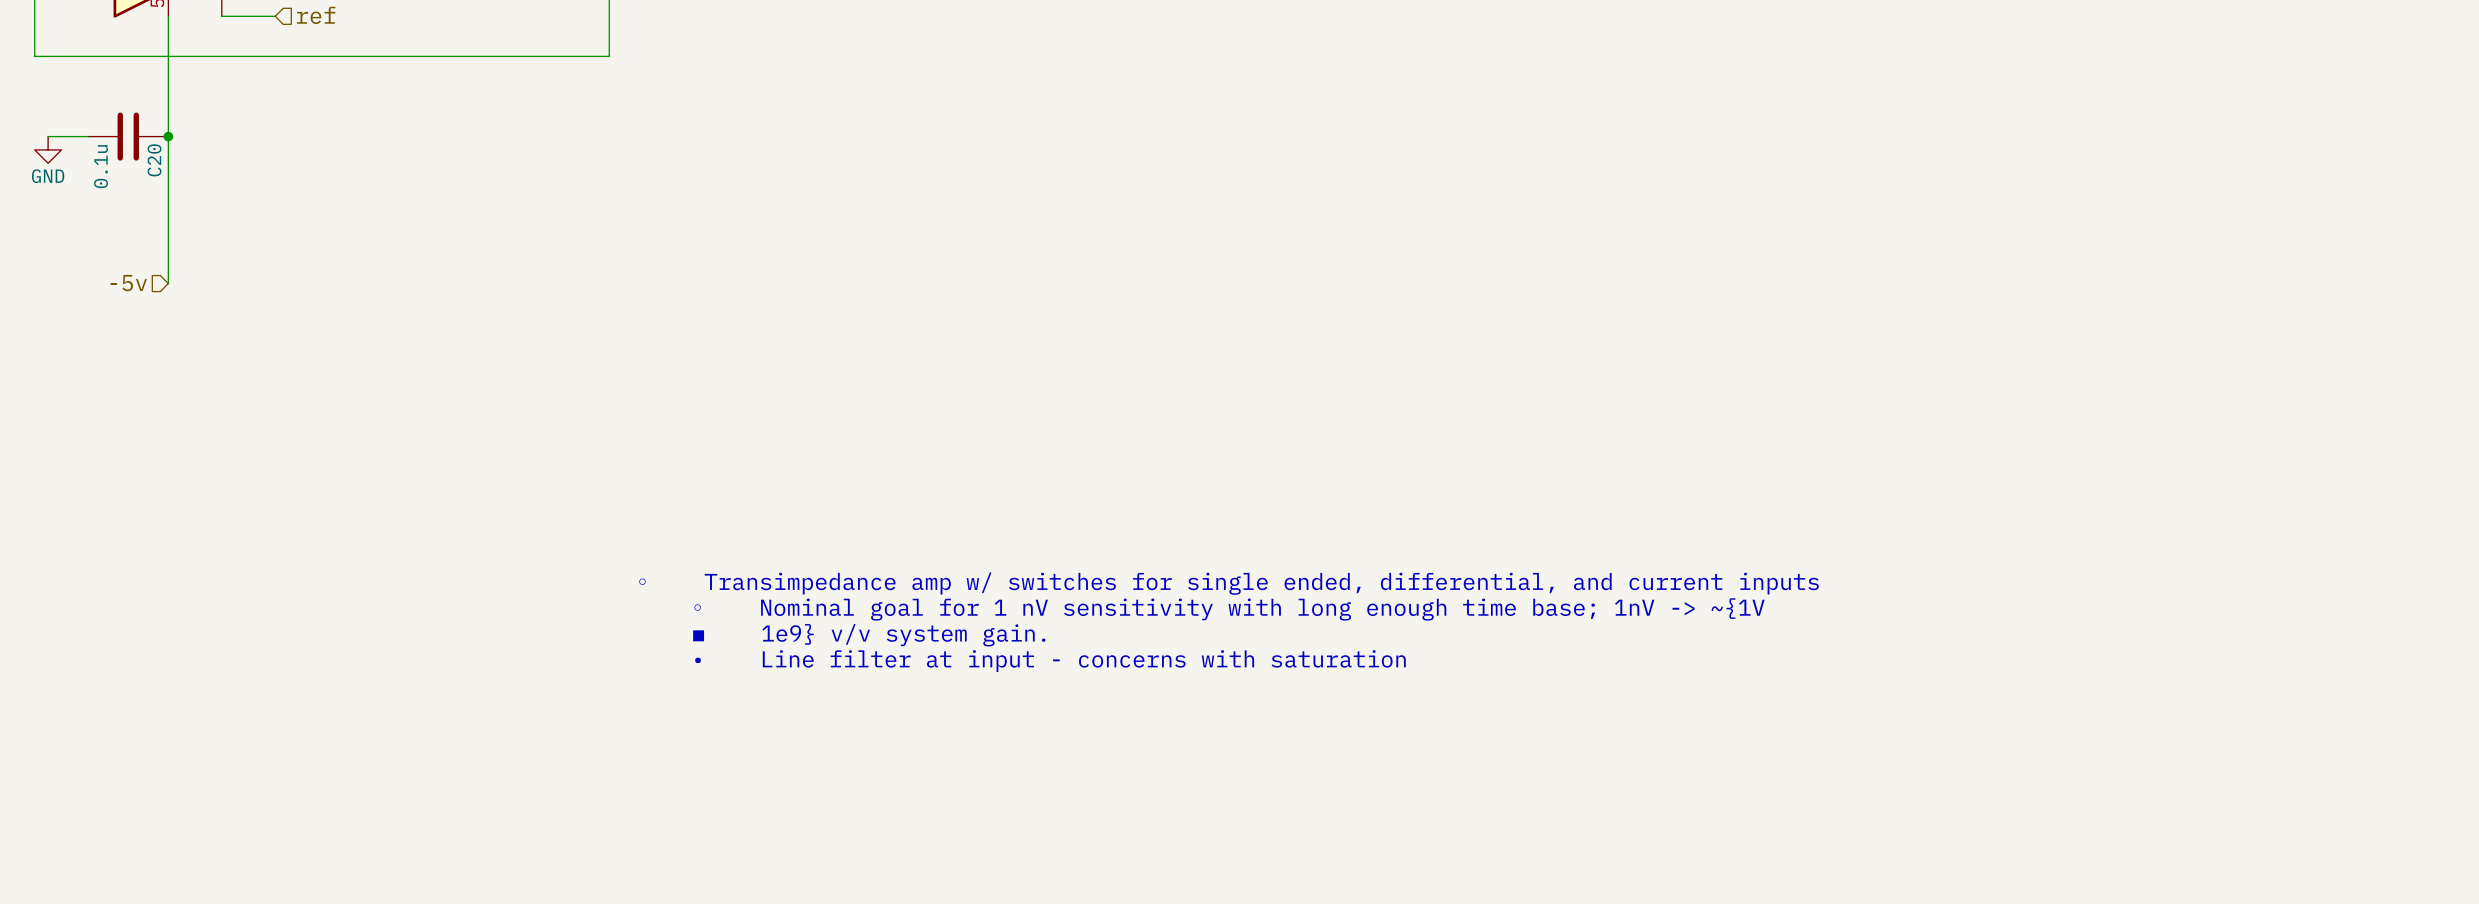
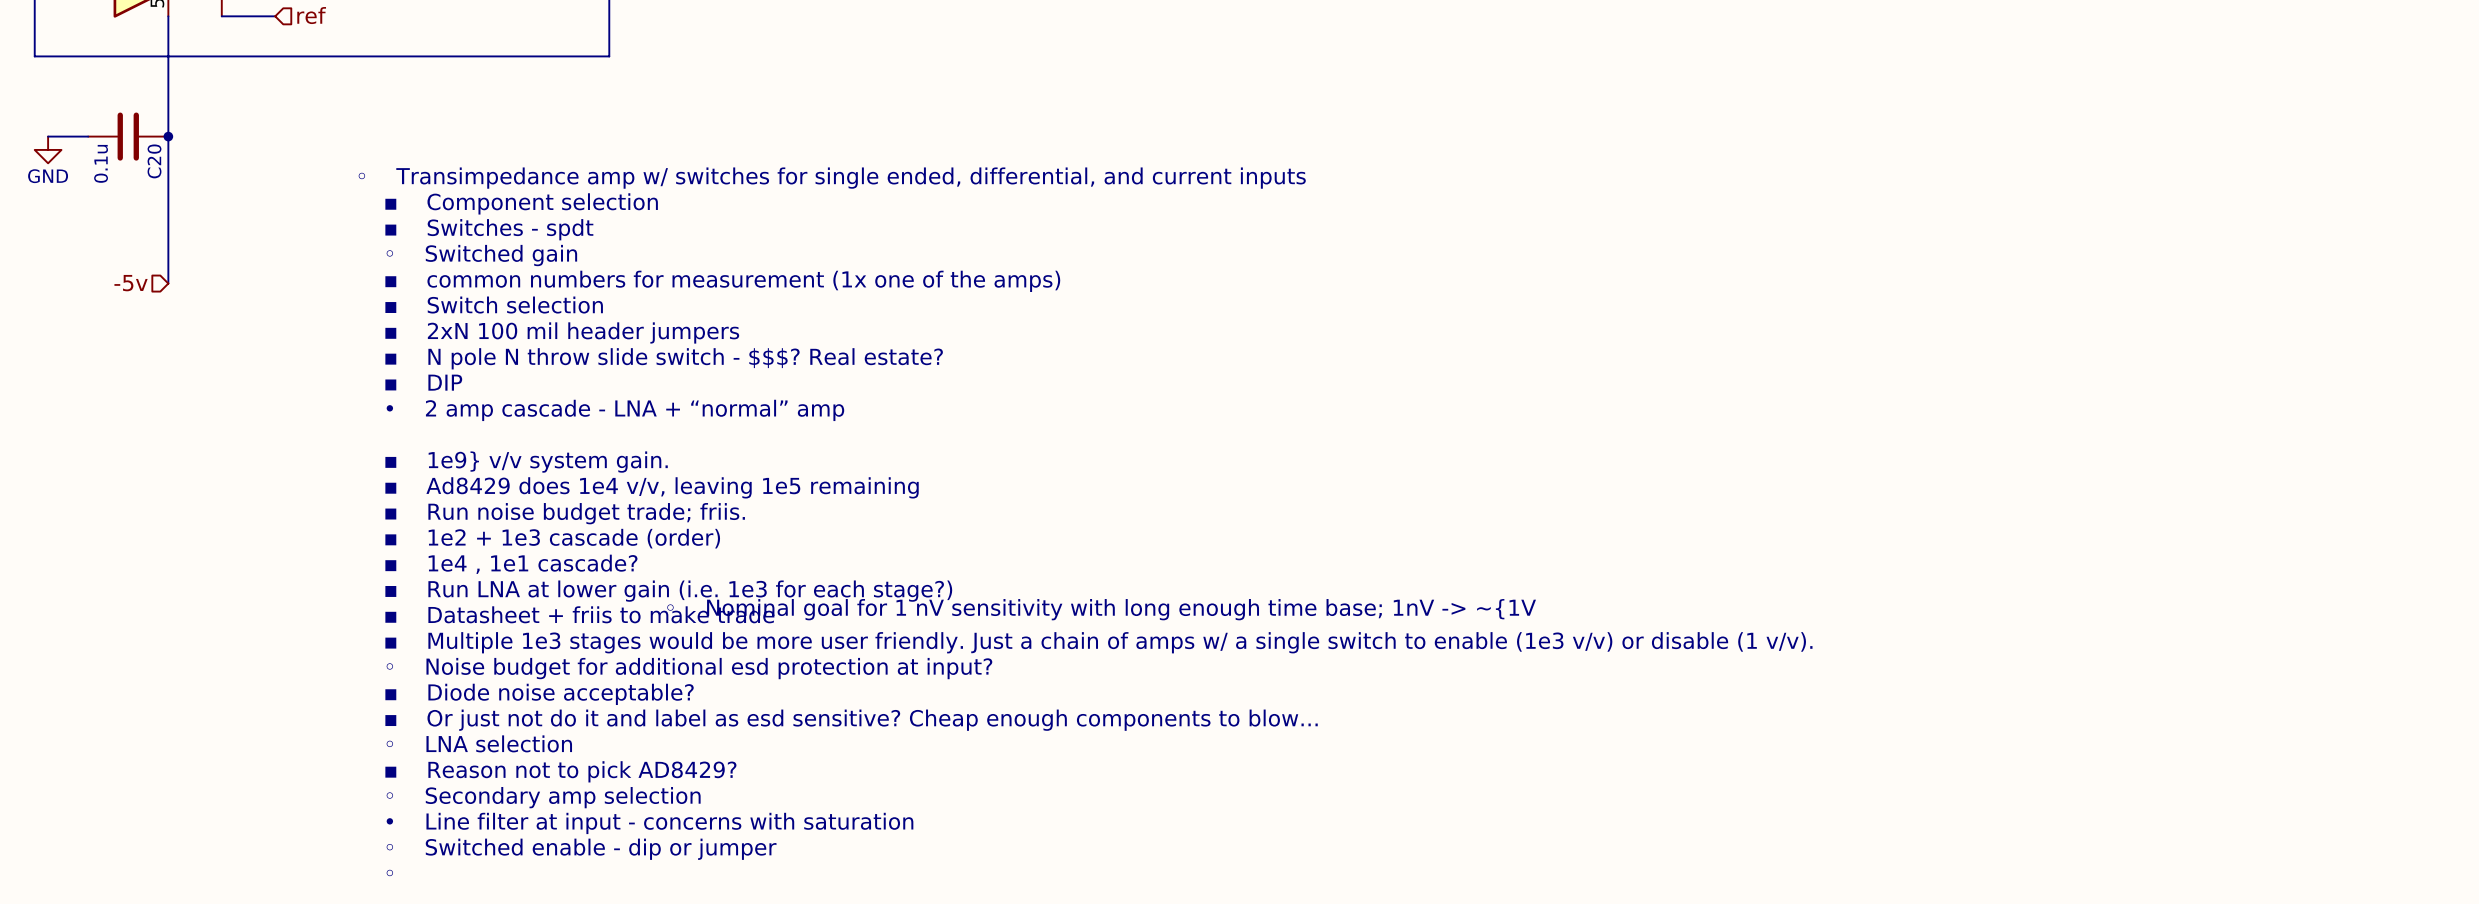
text: none -> ◦ Transimpedance amp w/ switches for single ended, differential, and current inputs (832, 178)
text: none -> ▪ Component selection (521, 203)
text: none -> ▪ Switches - spdt (489, 229)
text: none -> ◦ Switched gain (481, 255)
text: none -> ▪ common numbers for measurement (1x one of the amps) (722, 281)
text: none -> ▪ Switch selection (494, 305)
text: none -> ▪ 2xN 100 mil header jumpers (562, 332)
text: none -> ▪ N pole N throw slide switch - $$$? Real estate? (664, 358)
text: none -> ▪ DIP (423, 382)
text: none -> • 2 amp cascade - LNA + “normal” amp (615, 410)
text: none -> ▪ 1e9} v/v system gain. (526, 462)
text: none -> ▪ Ad8429 does 1e4 v/v, leaving 1e5 remaining (652, 487)
text: none -> ▪ Run noise budget trade; friis. (565, 513)
text: none -> ▪ 1e2 + 1e3 cascade (order) (552, 538)
text: none -> ▪ 1e4 , 1e1 cascade? (511, 564)
text: ◦ Transimpedance amp w/ switches for single ended, differential, and current inputs (1229, 583) -> none
text: none -> ▪ Run LNA at lower gain (i.e. 1e3 for each stage?) (668, 591)
text: none -> ▪ Datasheet + friis to make trade (579, 614)
text: ▪ 1e9} v/v system gain. (869, 635) -> none
text: none -> ▪ Multiple 1e3 stages would be more user friendly. Just a chain of amps w/ a single switch to enable (1e3 v/v) or disable (1 v/v). (1098, 642)
text: • Line filter at input - concerns with saturation (1050, 661) -> none
text: none -> ◦ Noise budget for additional esd protection at input? (689, 668)
text: none -> ▪ Diode noise acceptable? (539, 694)
text: none -> ▪ Or just not do it and label as esd sensitive? Cheap enough components to blow... (851, 720)
text: none -> ◦ LNA selection (479, 743)
text: none -> ▪ Reason not to pick AD8429? (560, 771)
text: none -> ◦ Secondary amp selection (543, 797)
text: none -> • Line filter at input - concerns with saturation (650, 823)
text: none -> ◦ Switched enable - dip or jumper (581, 849)
text: none -> ◦ (389, 872)

